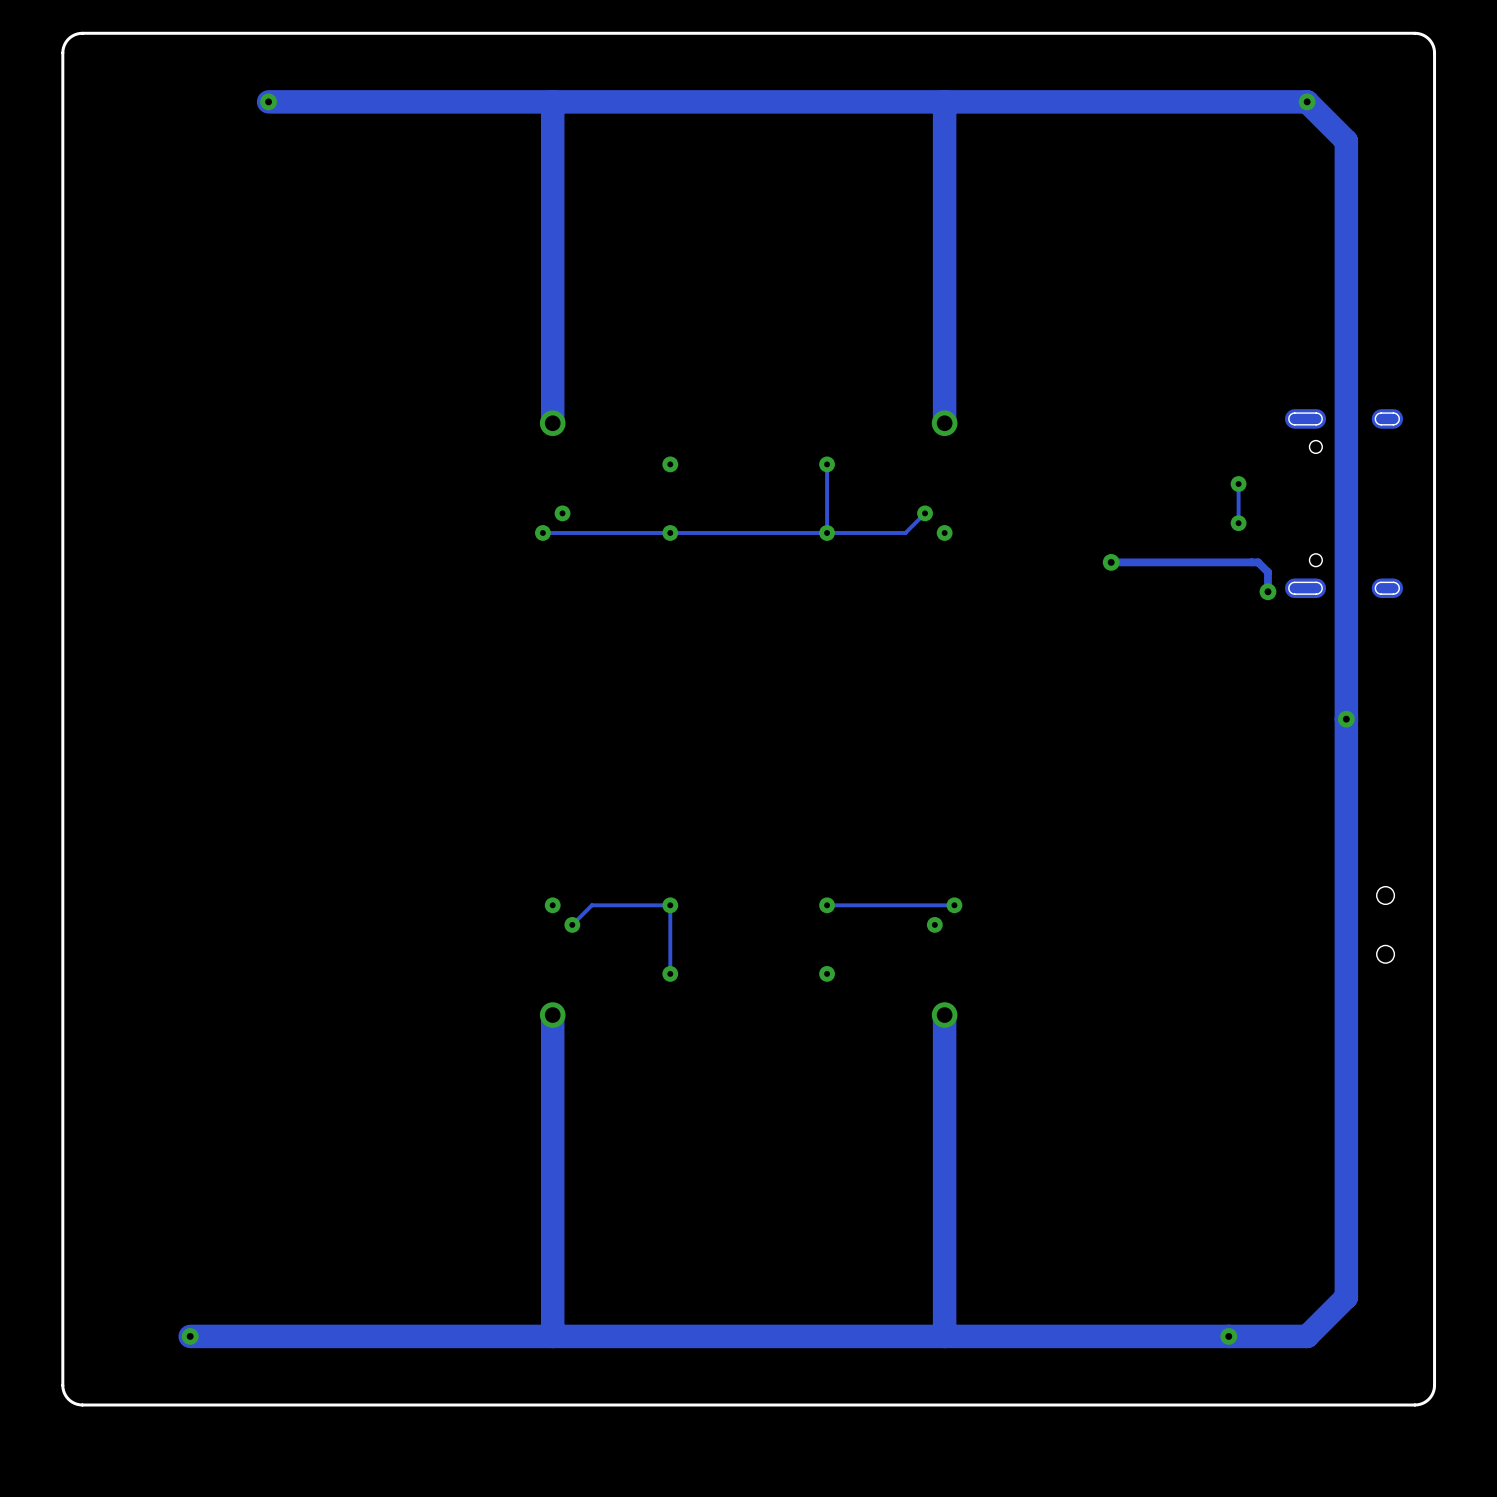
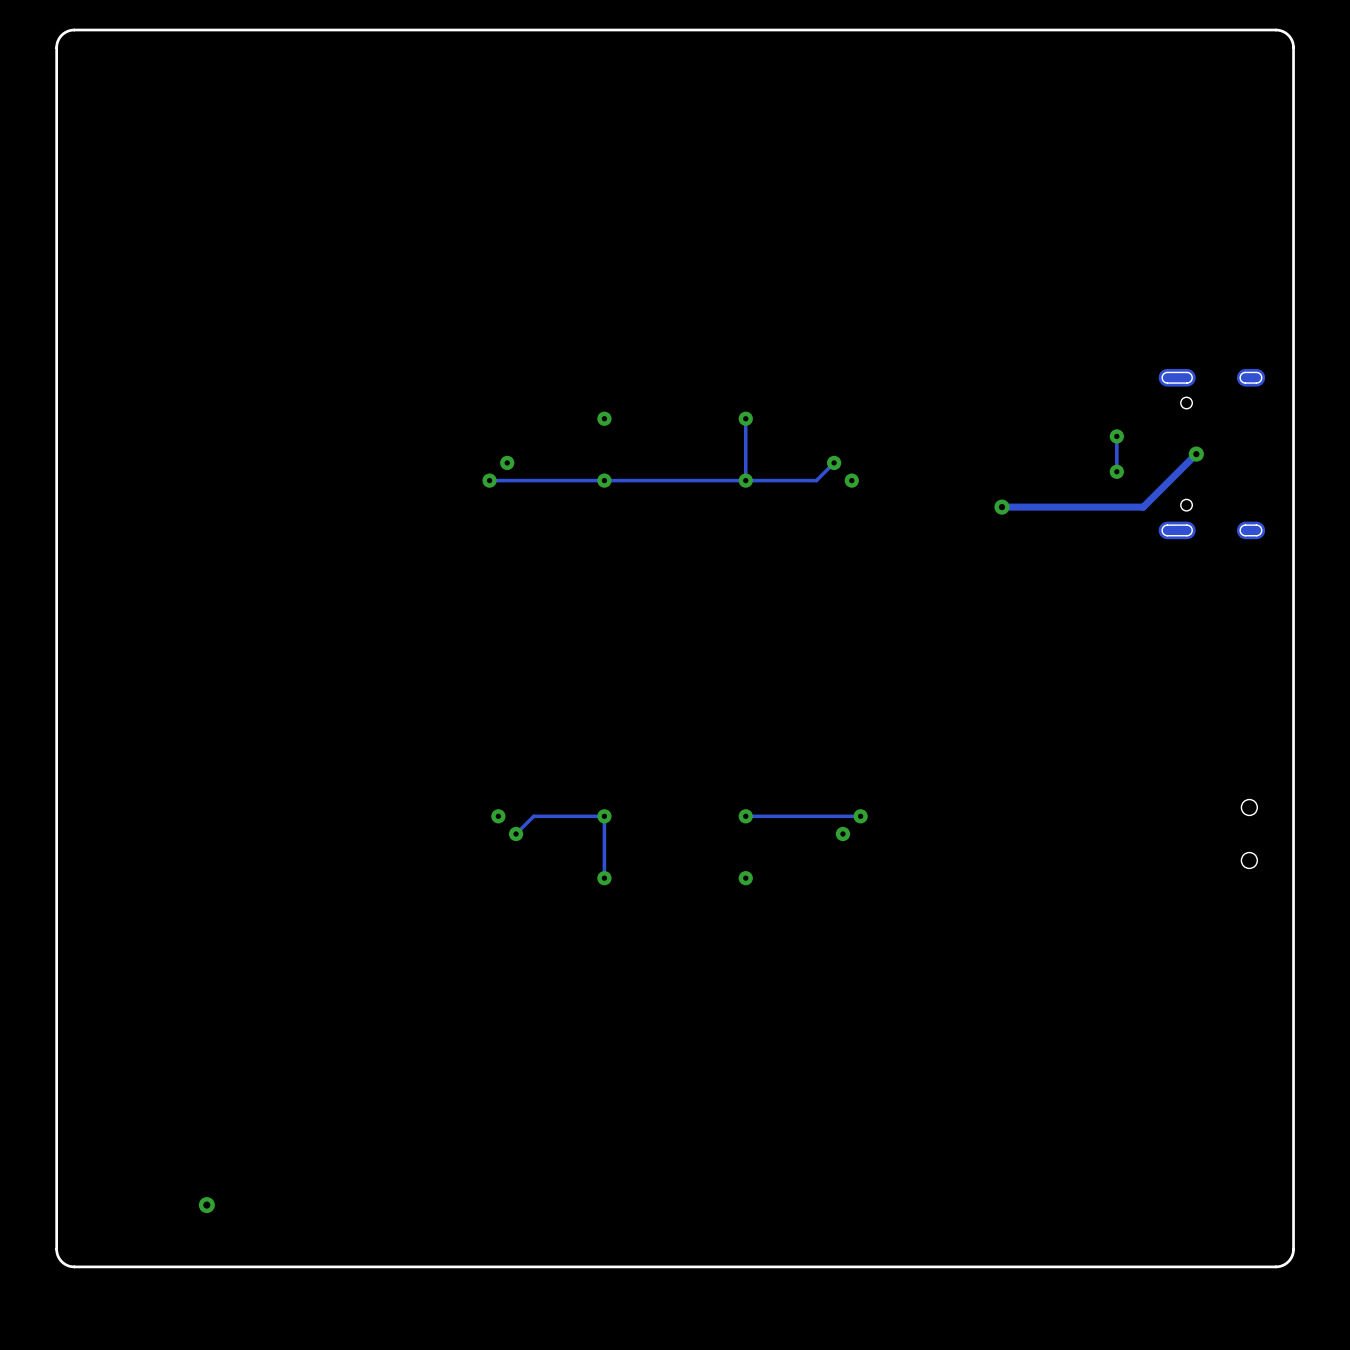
track: (268, 101) (1307, 101) (1346, 141) (1346, 1297) (1307, 1336) (190, 1336) -> none
via: (268, 101) -> none
track: (552, 101) (552, 423) -> none
track: (944, 101) (944, 423) -> none
via: (1307, 101) -> none
via: (552, 423) -> none
via: (944, 423) -> none
track: (1258, 562) (1267, 572) (1267, 591) -> (1134, 507) (1143, 507) (1196, 454)
via position: (1267, 591) -> (1196, 454)
via: (1346, 719) -> none
track: (552, 1015) (552, 1336) -> none
via: (552, 1015) -> none
track: (944, 1015) (944, 1336) -> none
via: (944, 1015) -> none
via: (190, 1336) -> none
via: none -> (206, 1205)
via: (1228, 1336) -> none

